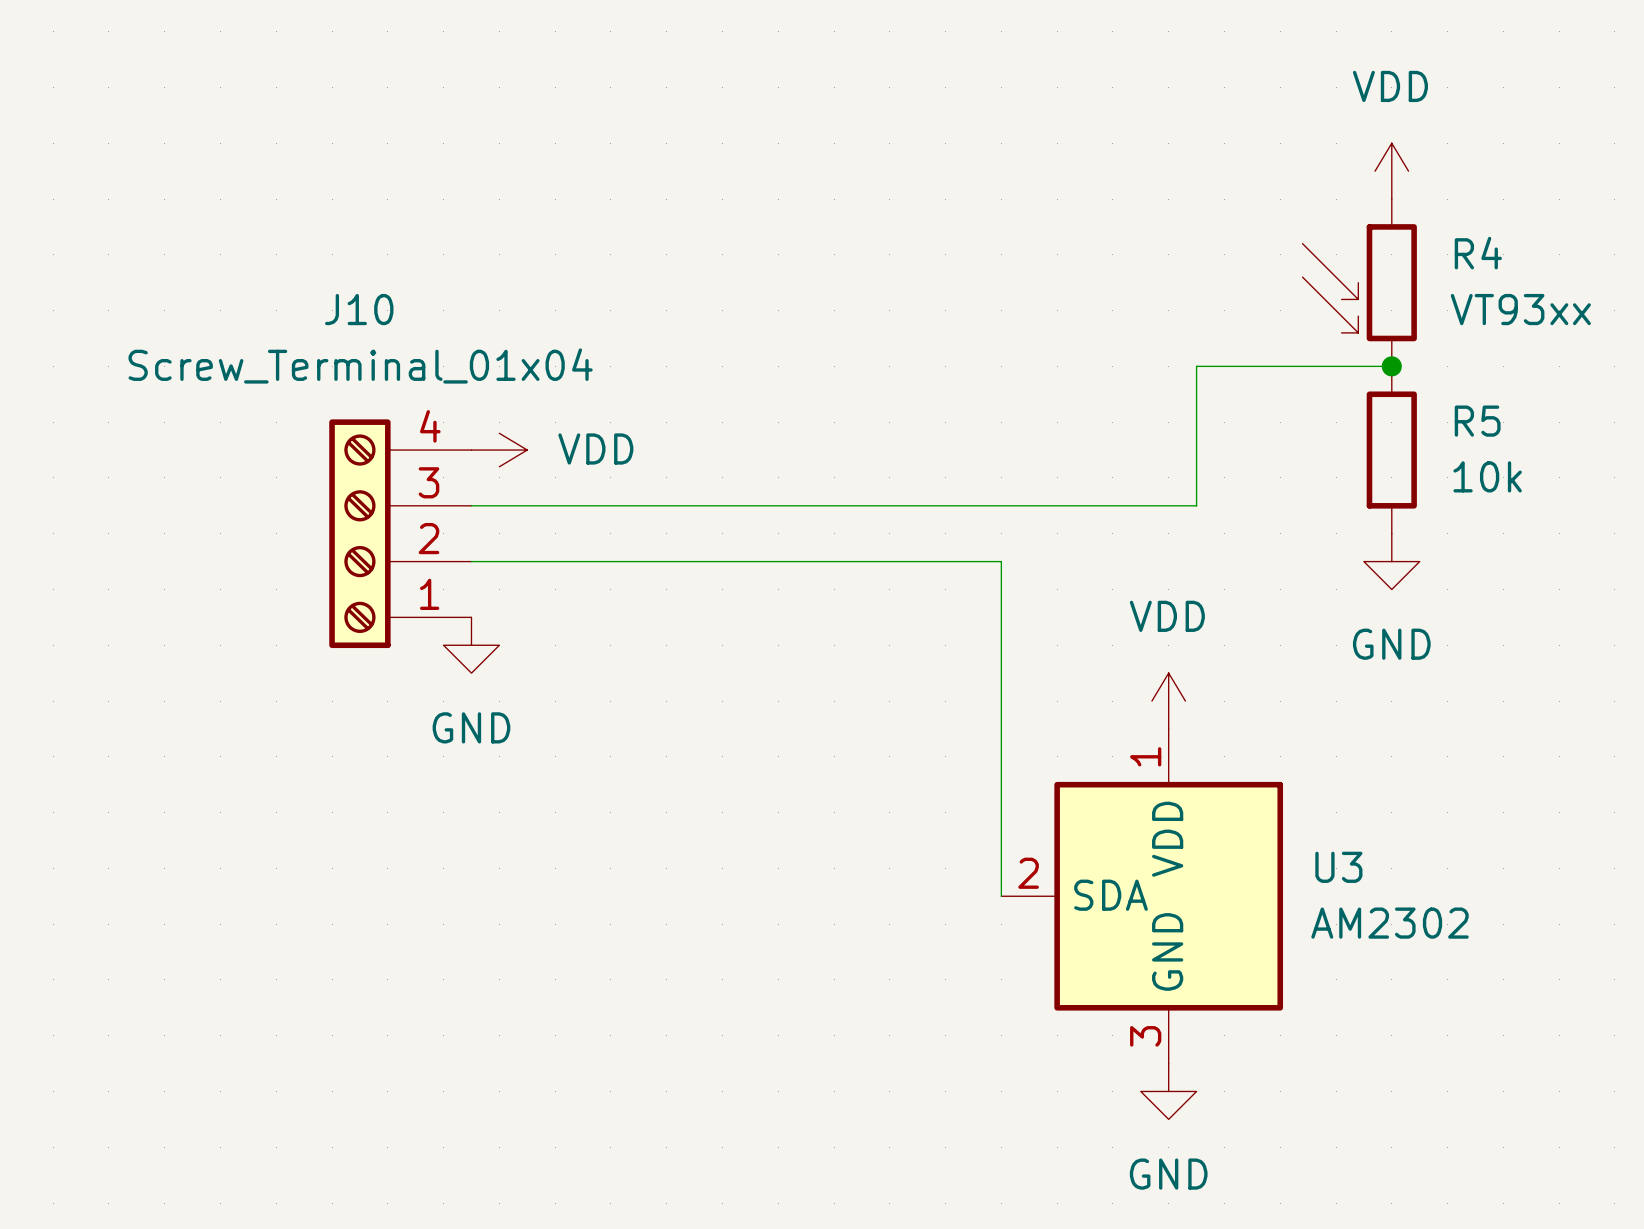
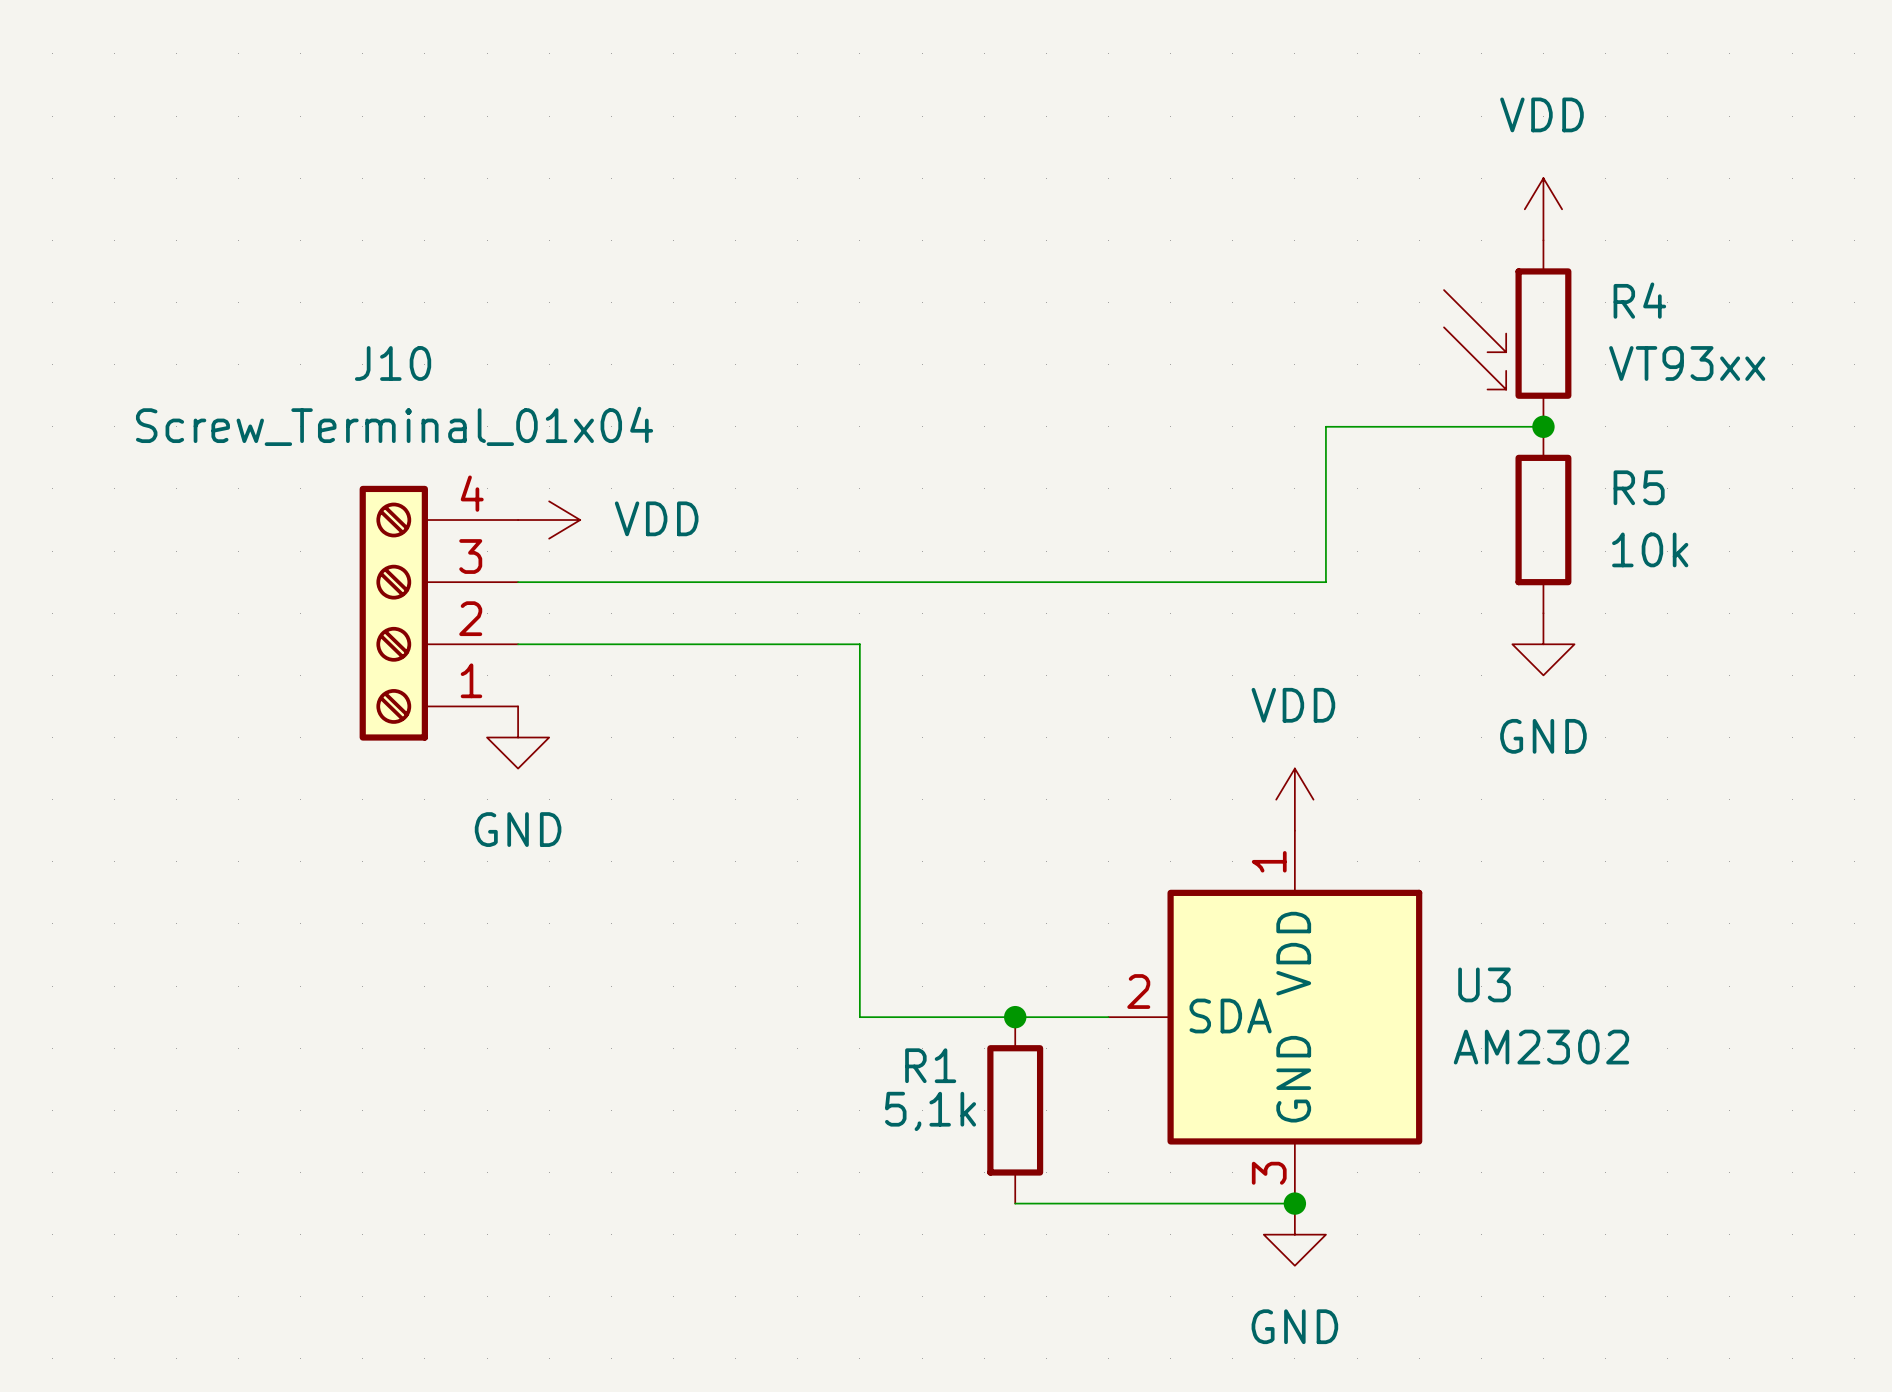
wire: (778, 561) (1001, 561) (1001, 896) -> (859, 644) (859, 1017) (1108, 1017)
junction: none -> (1015, 1017)
R1: none -> 5,1k (1015, 1110)
wire: none -> (1015, 1203) (1294, 1203)
junction: none -> (1294, 1203)

